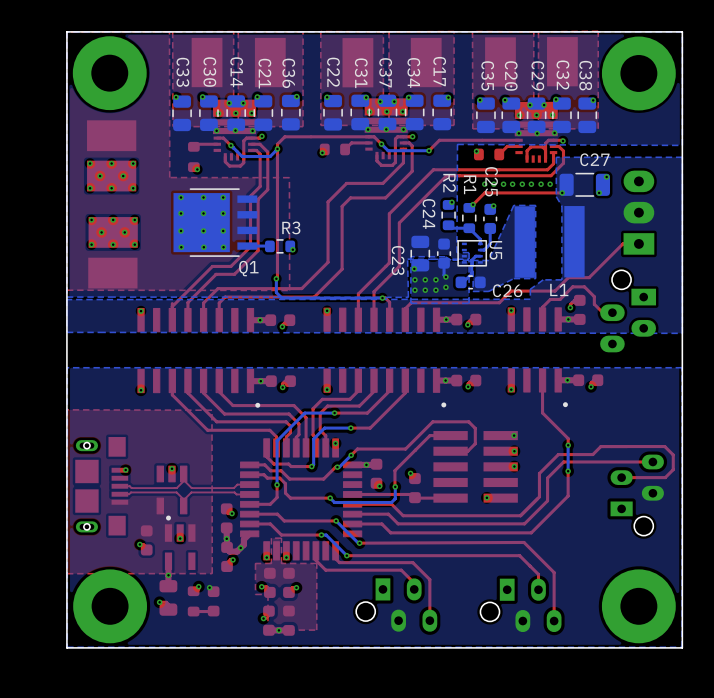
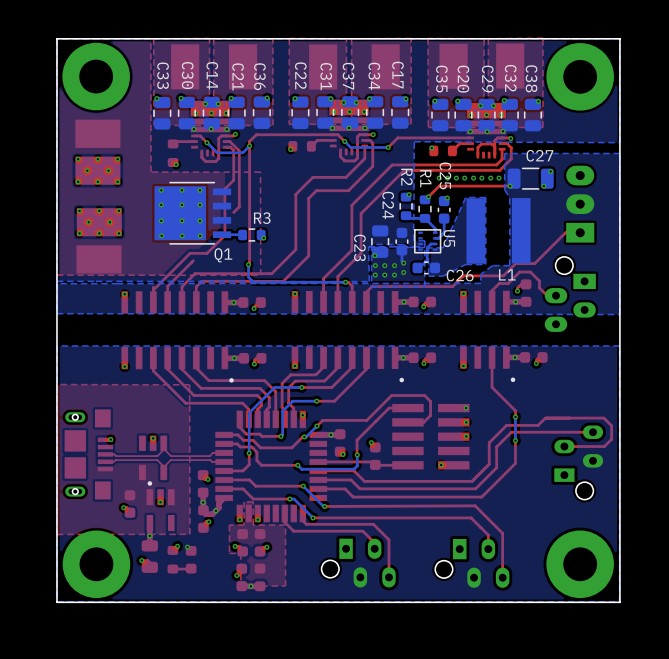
top track: (255, 144) (259, 144) (267, 152) (267, 189) (258, 199) (258, 250) (234, 274) (216, 274) -> (229, 141) (239, 151) (239, 206) (233, 212)

